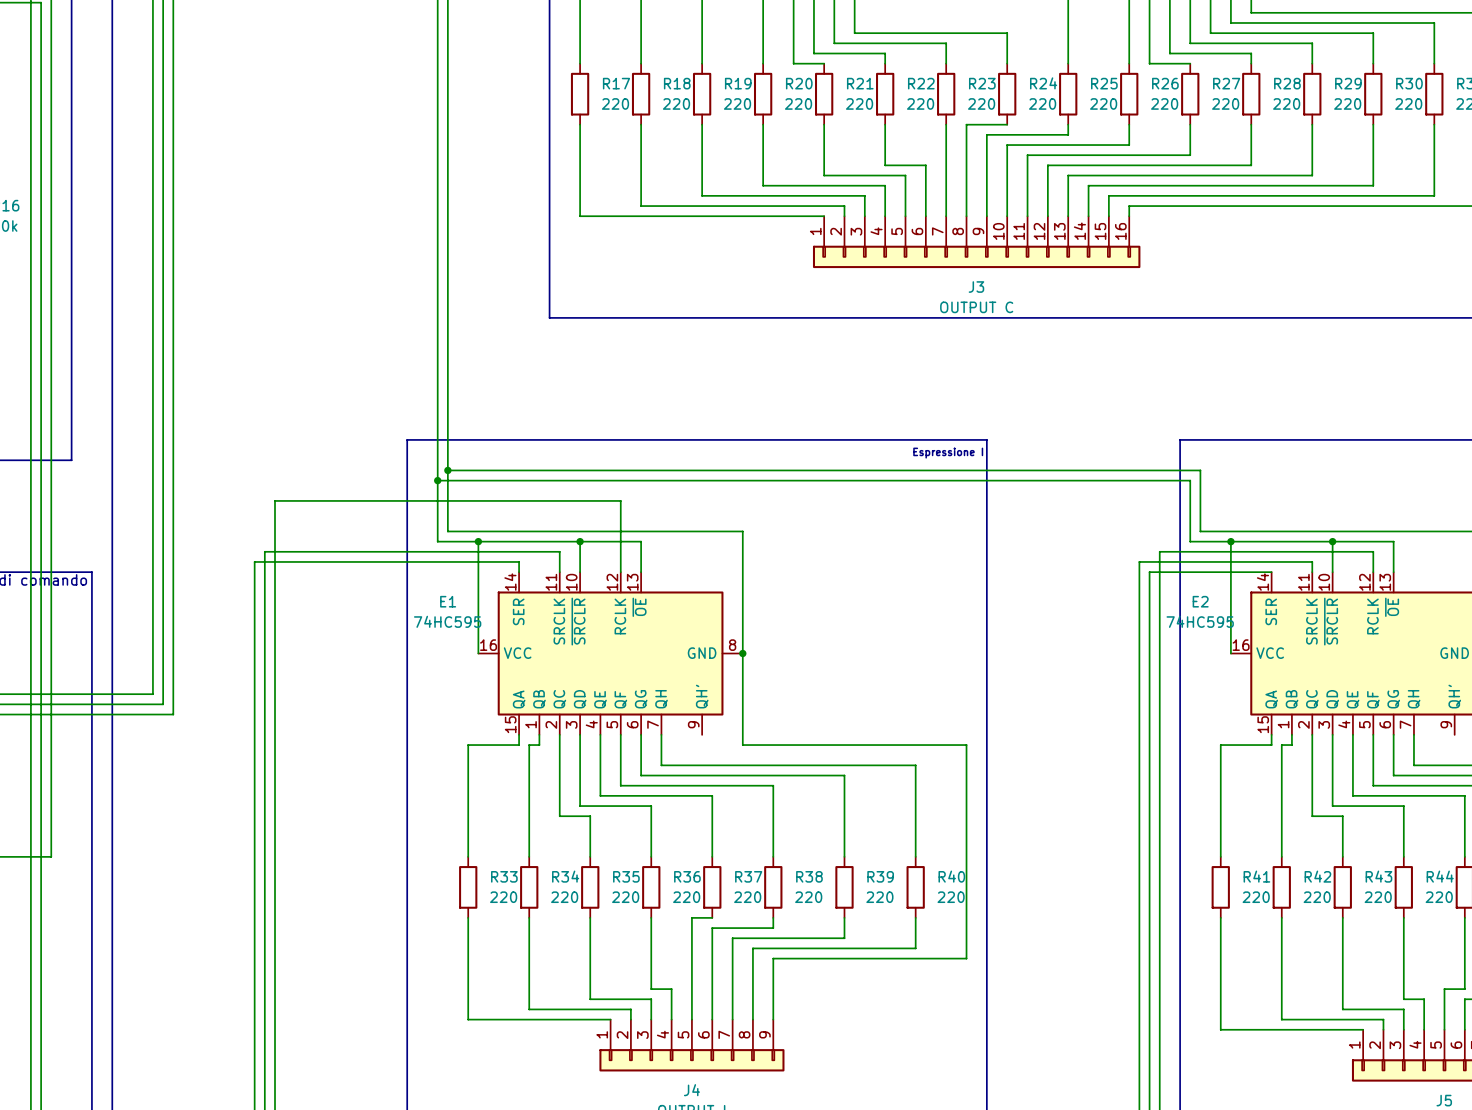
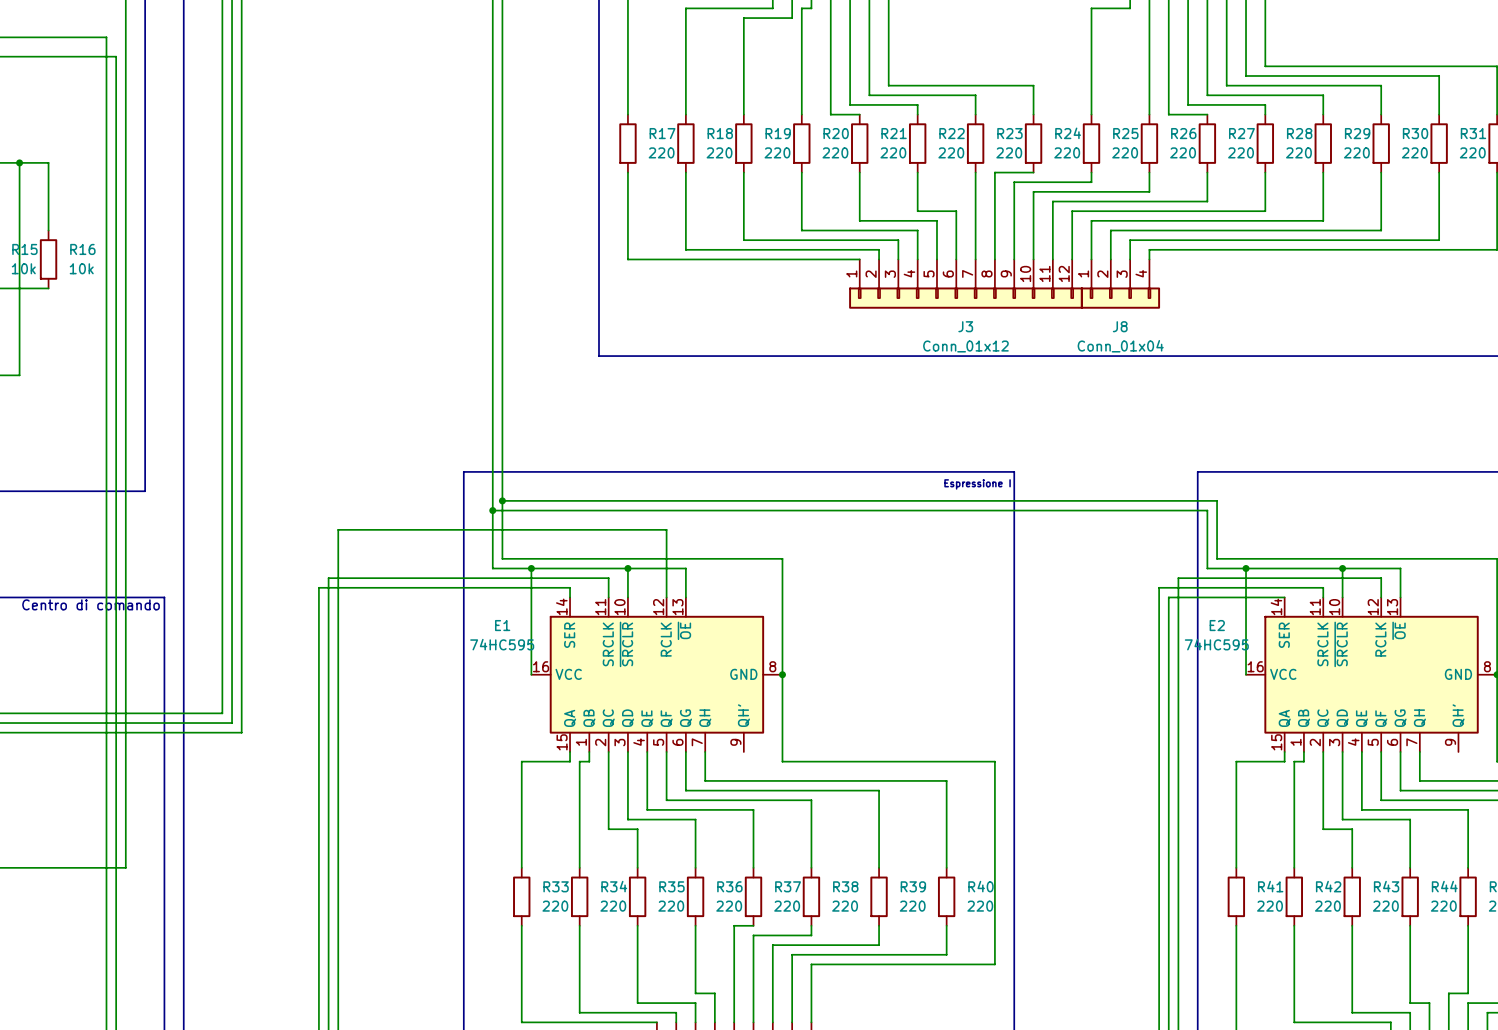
J3 symbol: [812, 216, 1141, 269] -> [849, 259, 1083, 309]
J8: none -> Conn_01x04 (1120, 284)
J3 value: OUTPUT C (976, 307) -> Conn_01x12 (965, 346)

